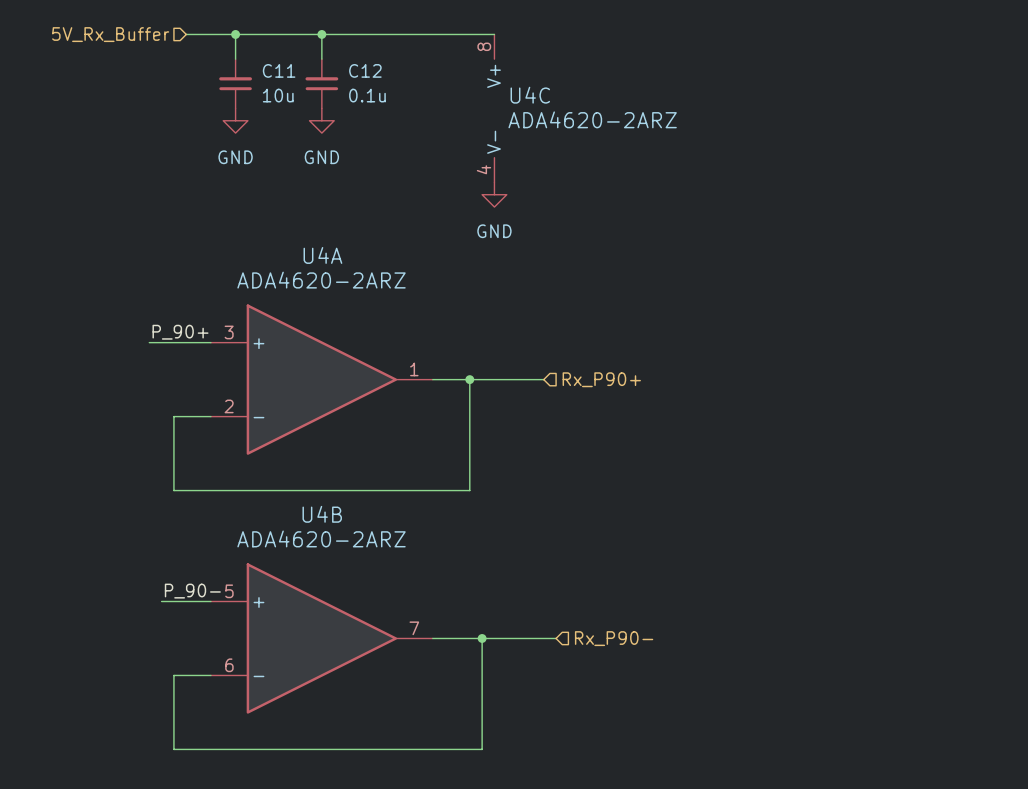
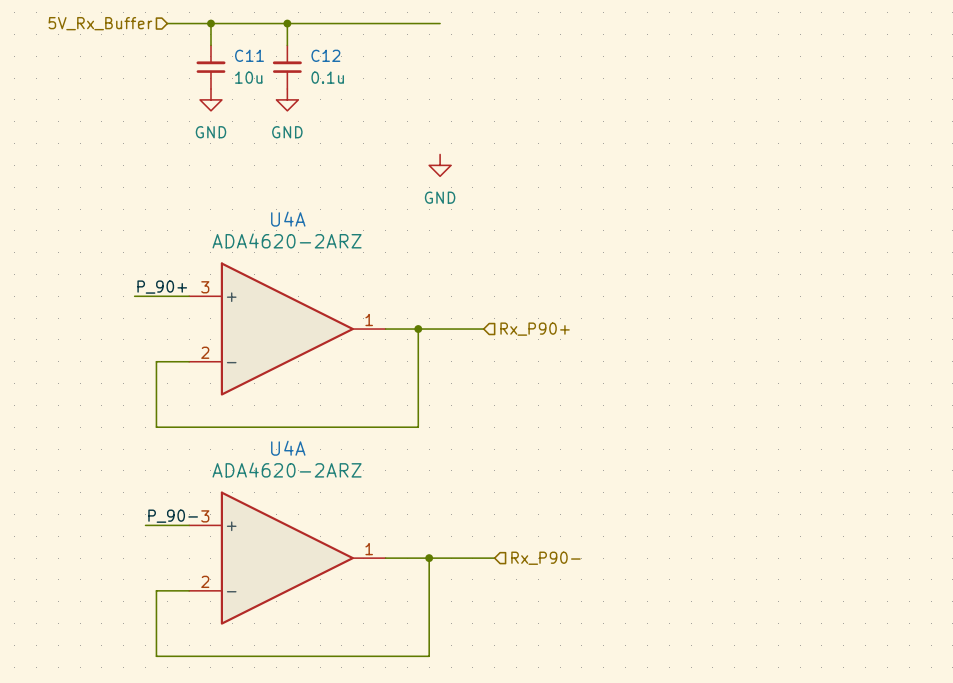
U4C: ADA4620-2ARZ (494, 108) -> none
U4B name: U4B (322, 514) -> U4A (288, 448)
U4B pin number: 5 (229, 591) -> 3 (205, 516)
U4B pin number: 7 (414, 628) -> 1 (369, 549)
U4B pin number: 6 (229, 665) -> 2 (205, 581)

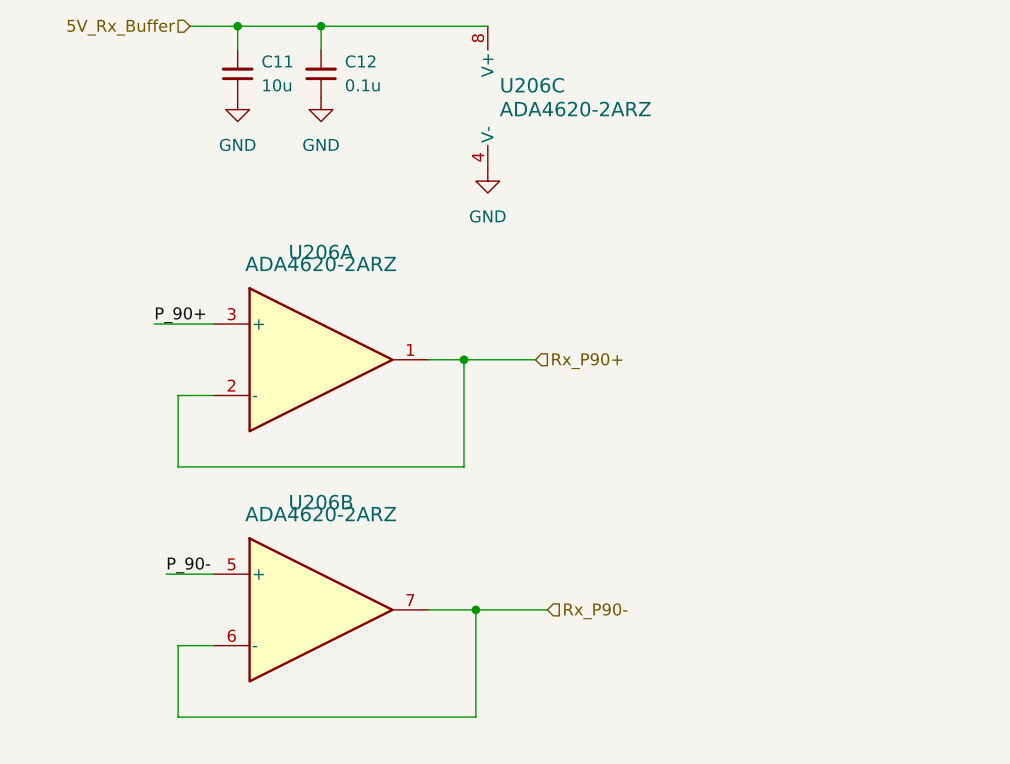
U206C: none -> ADA4620-2ARZ (487, 97)
U4A name: U4A (288, 219) -> U206A (321, 252)
U4A name: U4A (288, 448) -> U206B (321, 502)
U4A pin number: 3 (205, 516) -> 5 (231, 564)
U4A pin number: 1 (369, 549) -> 7 (410, 600)
U4A pin number: 2 (205, 581) -> 6 (231, 635)

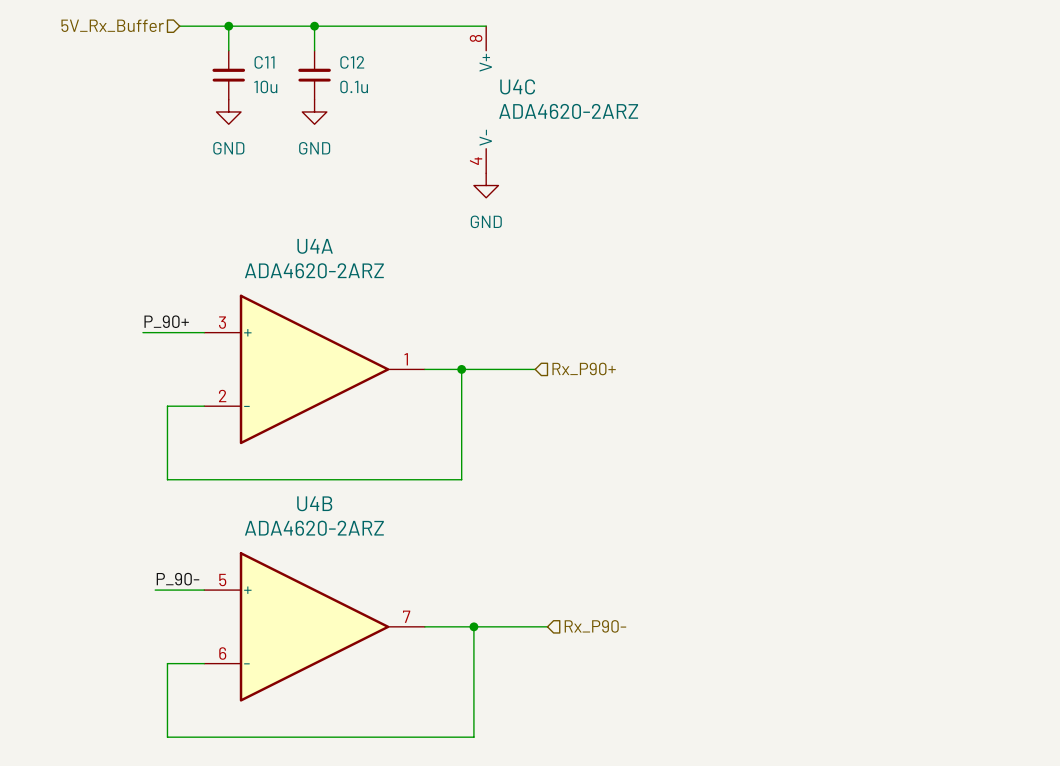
U206C name: U206C (532, 85) -> U4C (517, 86)
U206A name: U206A (321, 252) -> U4A (315, 246)
U206B name: U206B (321, 502) -> U4B (314, 503)

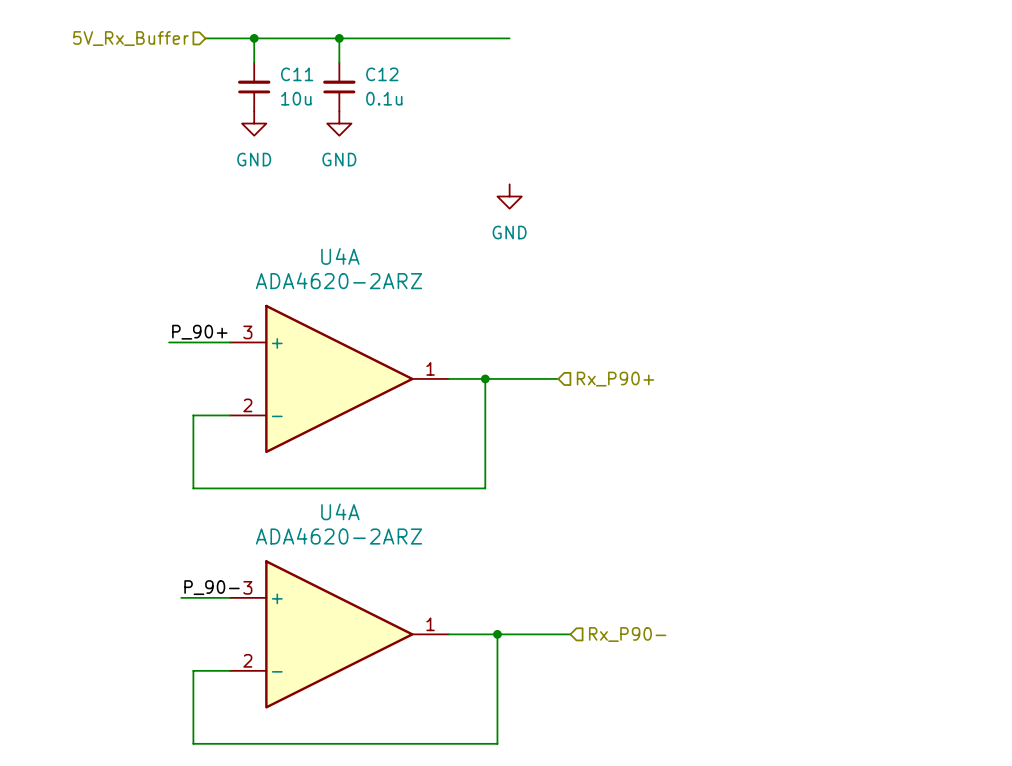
U4C: ADA4620-2ARZ (486, 99) -> none
U4B name: U4B (314, 503) -> U4A (340, 511)
U4B pin number: 5 (222, 580) -> 3 (247, 587)
U4B pin number: 7 (406, 616) -> 1 (430, 624)
U4B pin number: 6 (222, 653) -> 2 (247, 660)

